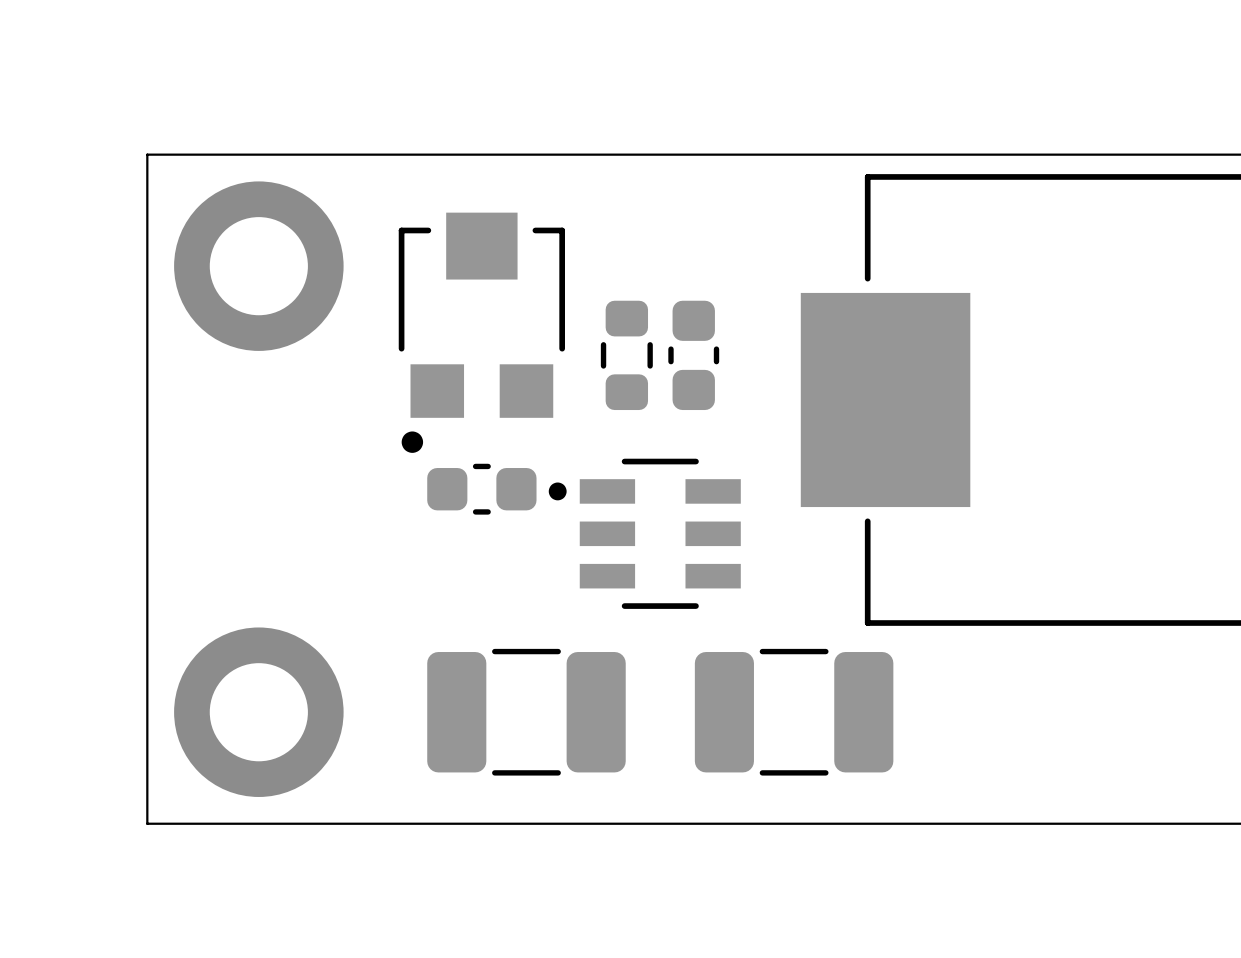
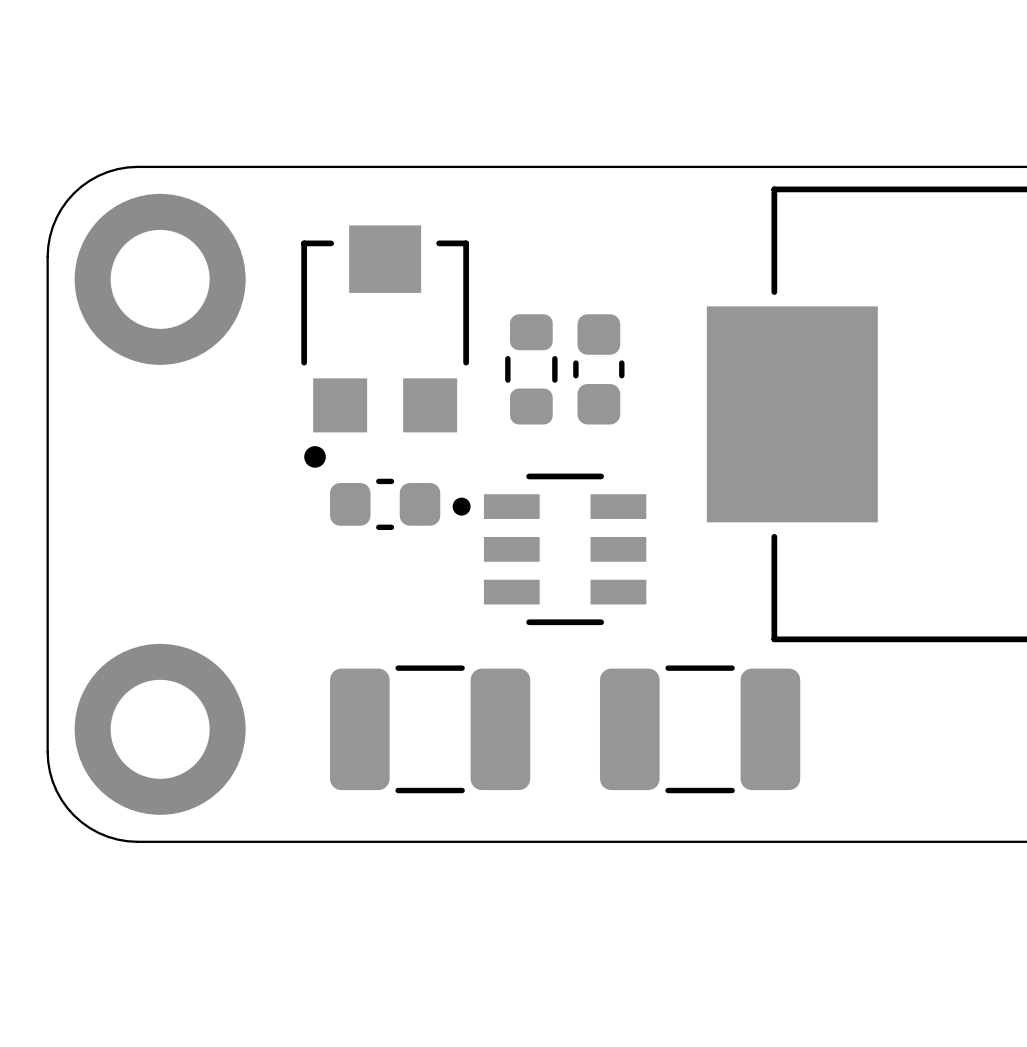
board edge: (236, 154) (147, 154) (147, 243) -> (137, 166) (107, 171) (89, 180) (74, 193) (61, 209) (52, 227) (47, 256)
board edge: (147, 734) (147, 823) (236, 823) -> (47, 751) (52, 781) (61, 799) (74, 815) (89, 828) (107, 836) (137, 841)

